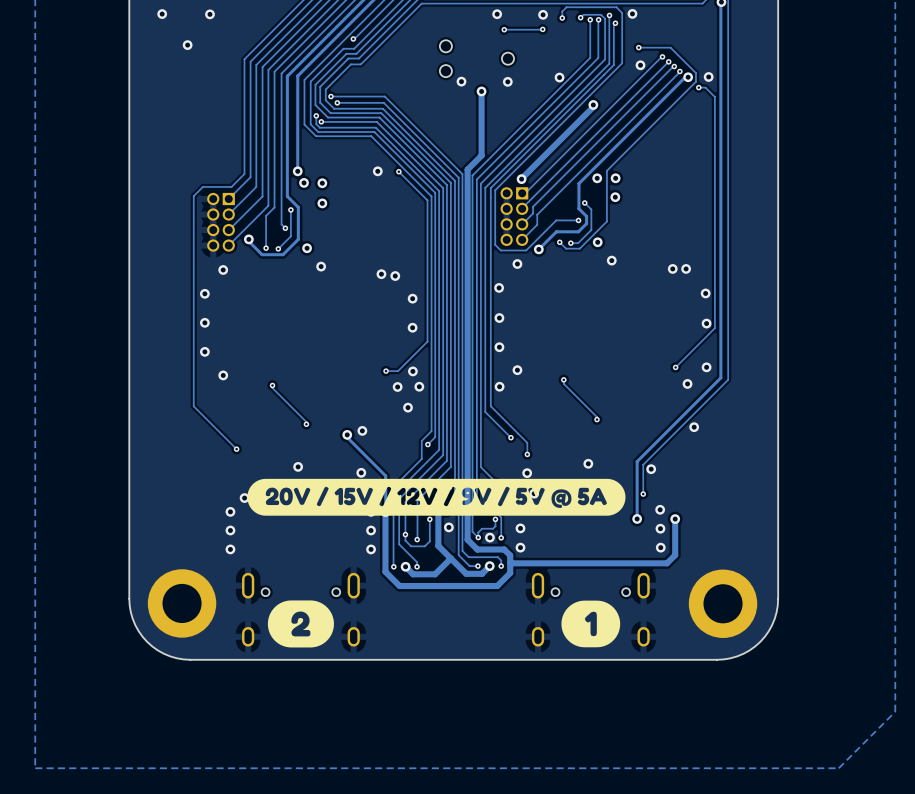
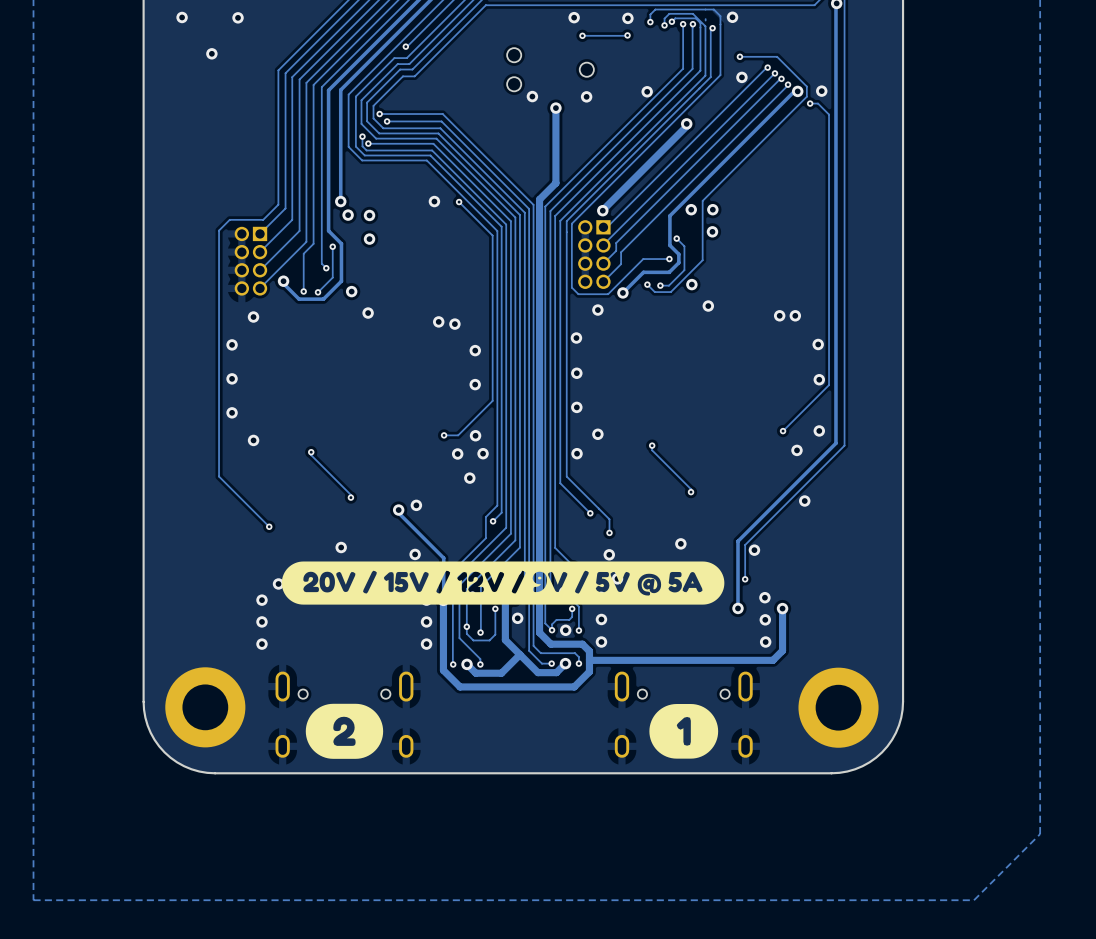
via position: (609, 15) -> (664, 25)
track: (609, 16) (609, 21) -> (664, 25) (664, 18) (669, 13) (692, 13) (705, 26)

